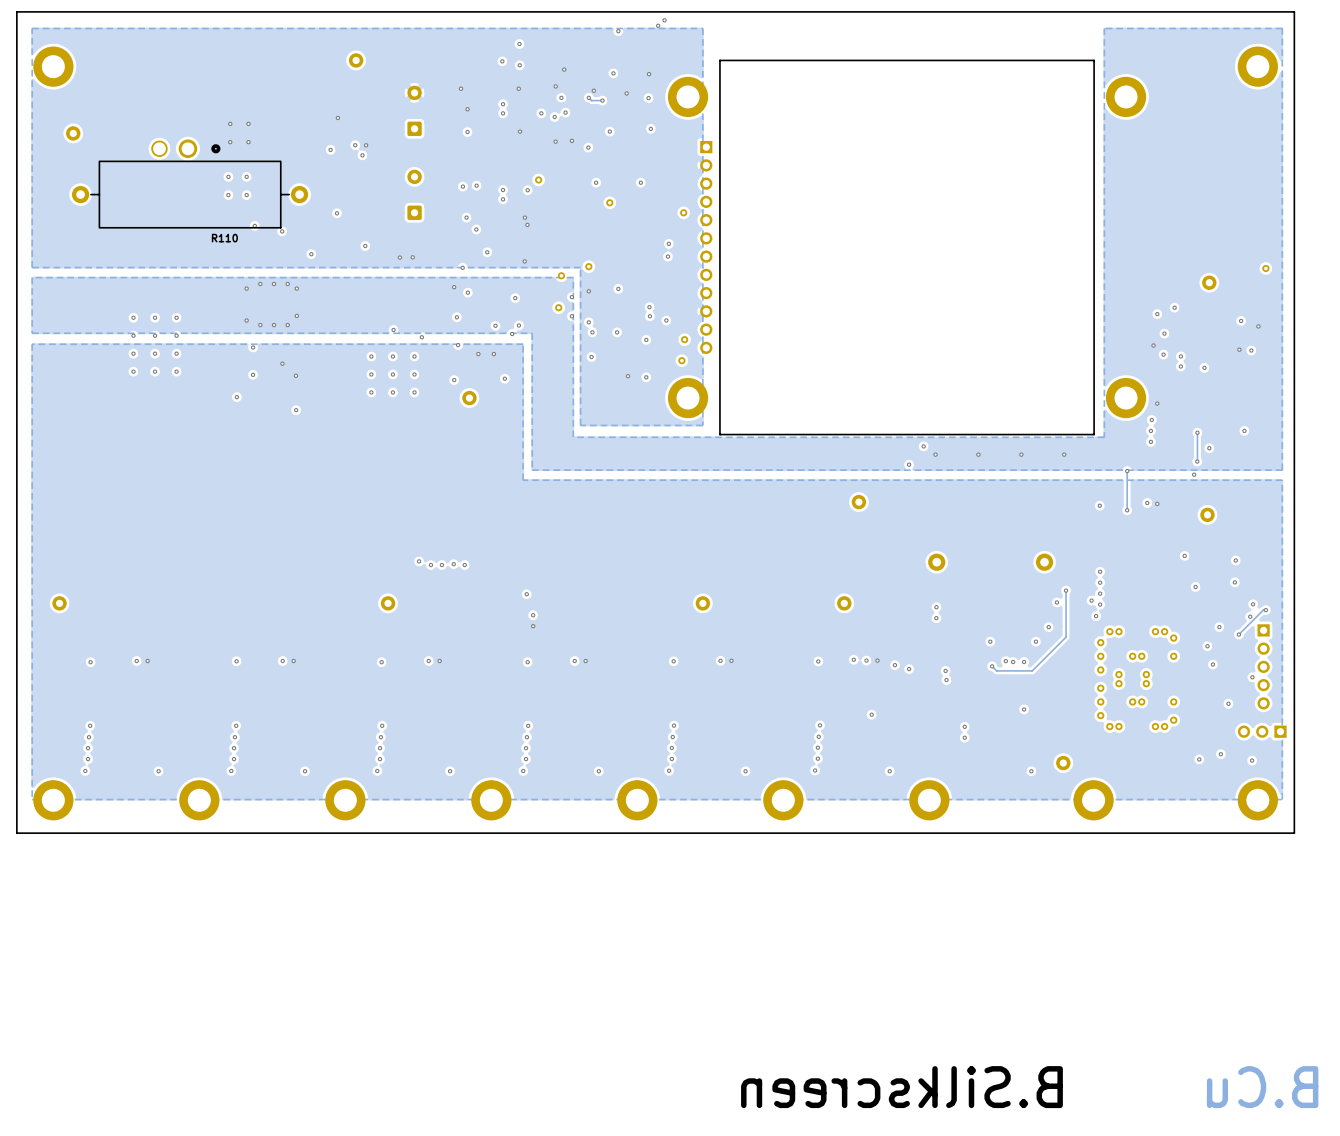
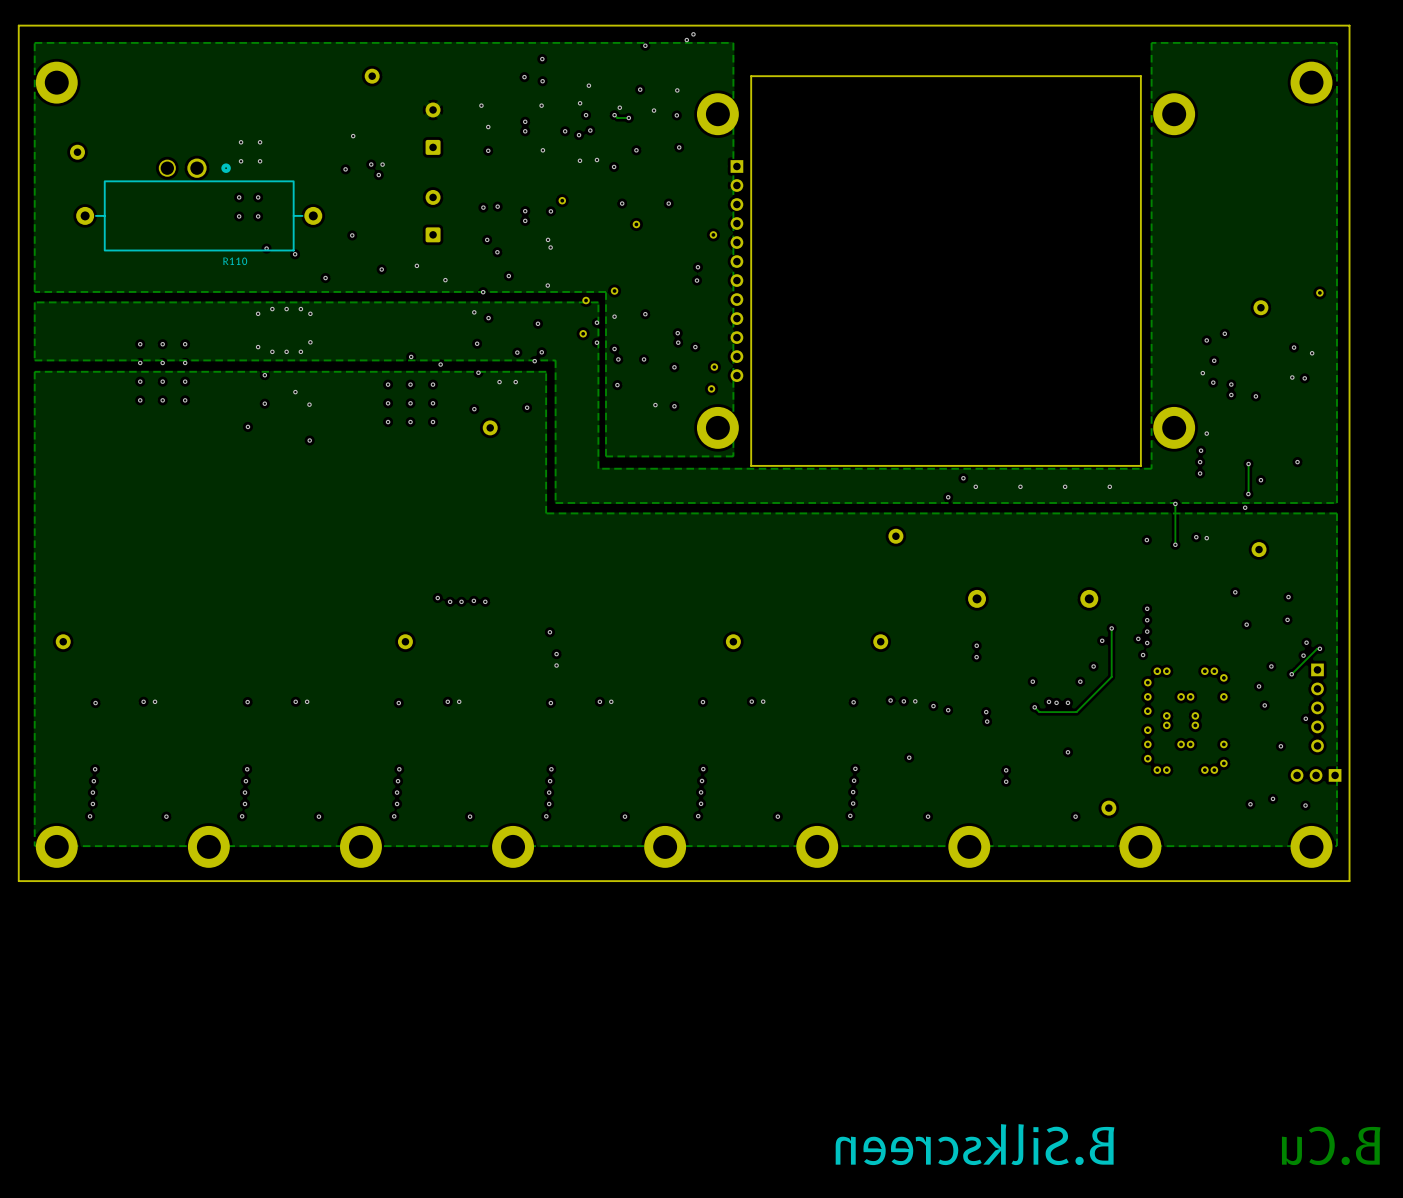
via: none -> (416, 265)
via: none -> (445, 280)
via: (399, 257) -> none
via: (412, 257) -> none

